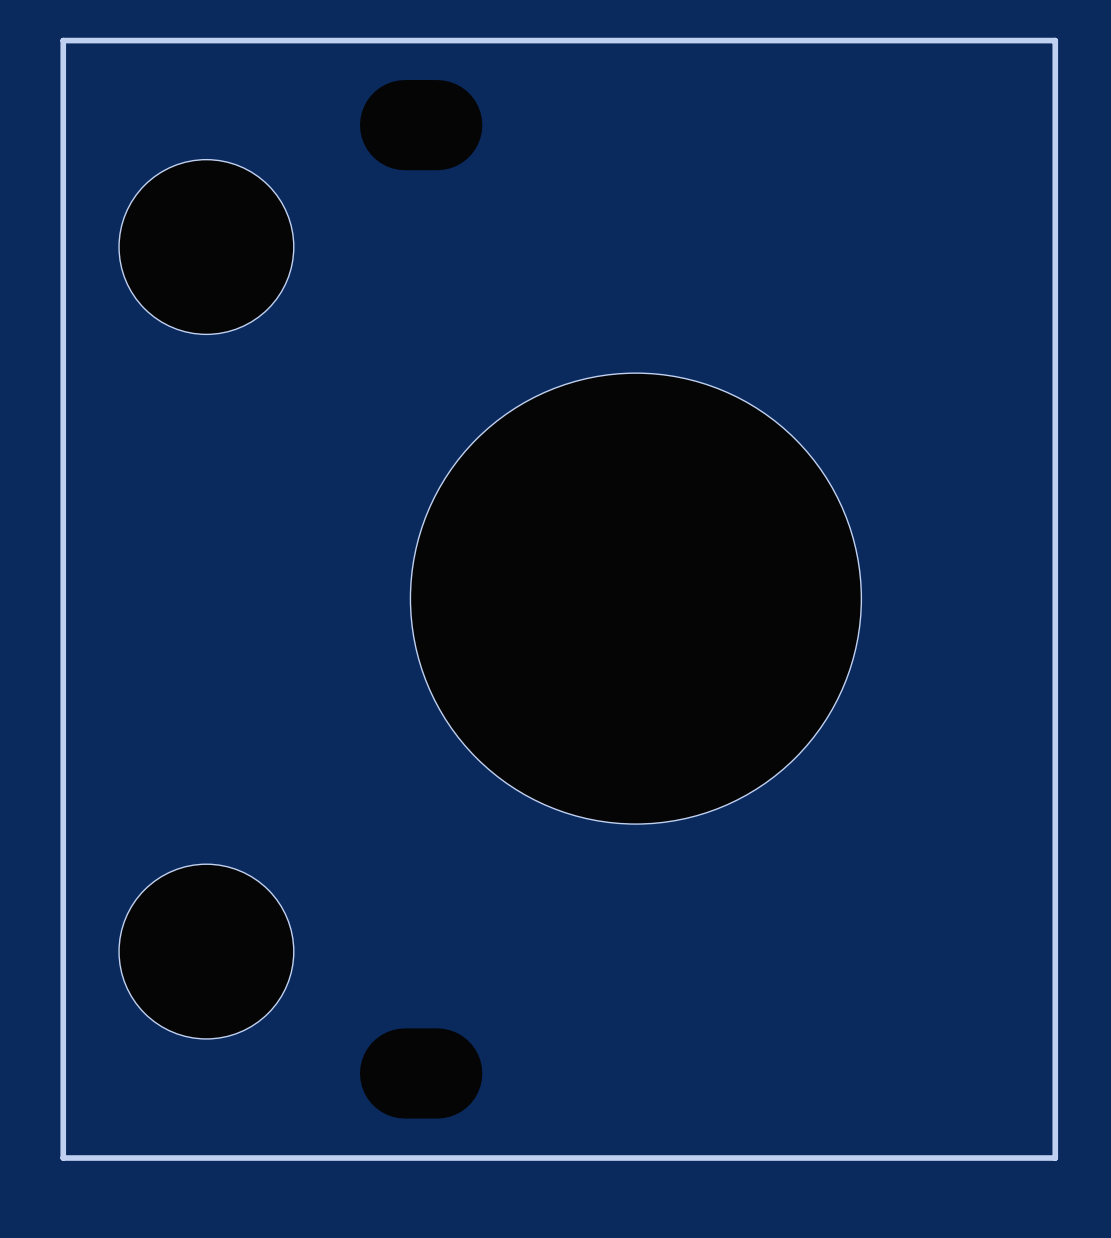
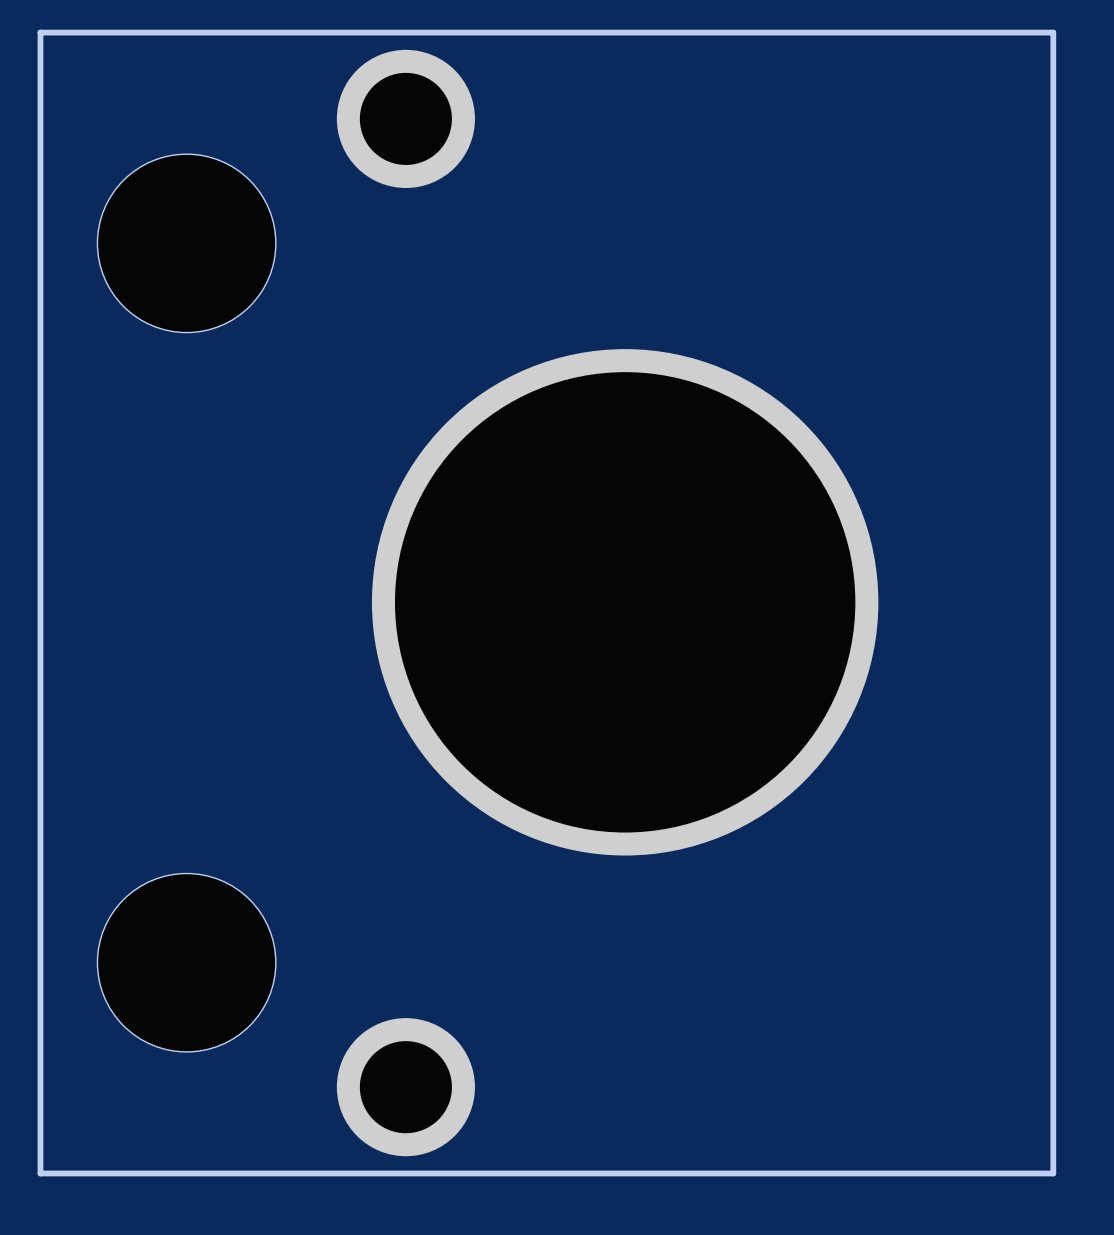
part footprint: [360, 80, 483, 171] -> [336, 49, 475, 188]
part footprint: [410, 373, 862, 825] -> [371, 349, 879, 856]
part footprint: [360, 1028, 483, 1119] -> [336, 1018, 475, 1157]

